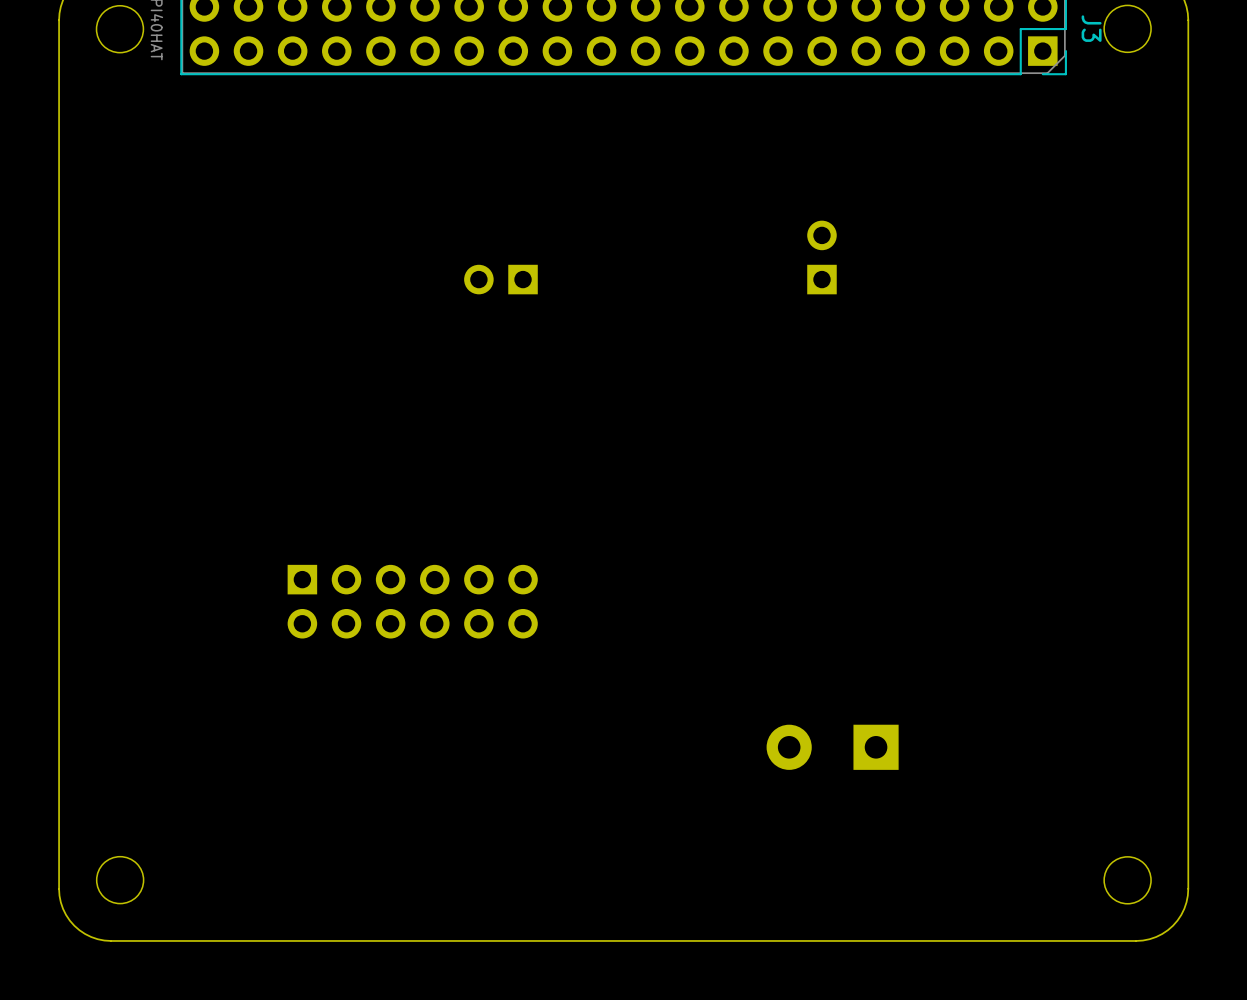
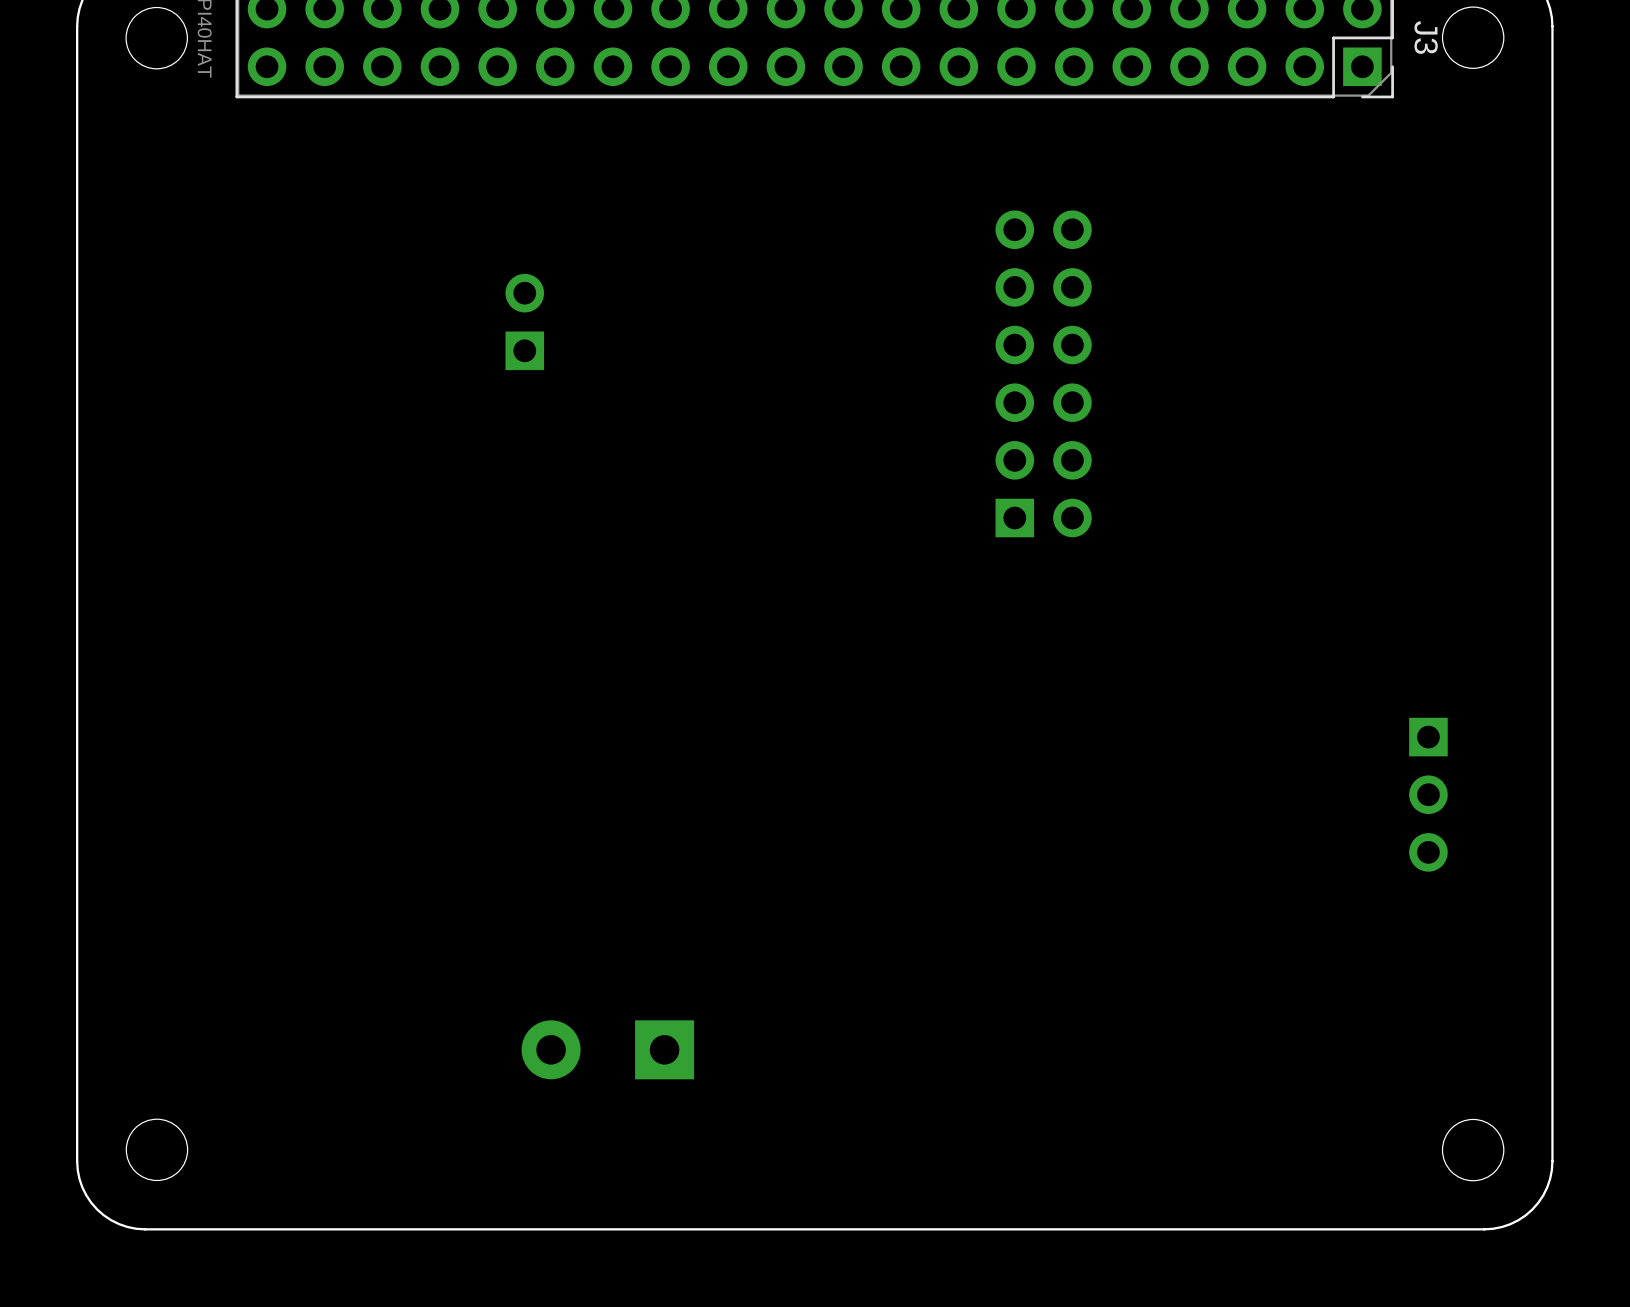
part: (821, 257) -> none
part rotation: 0° (500, 279) -> 90° clockwise (524, 321)
part position: (500, 279) -> (524, 321)
part: none -> (1043, 373)
part: (412, 601) -> none
part: none -> (1428, 794)
part position: (832, 747) -> (607, 1049)

